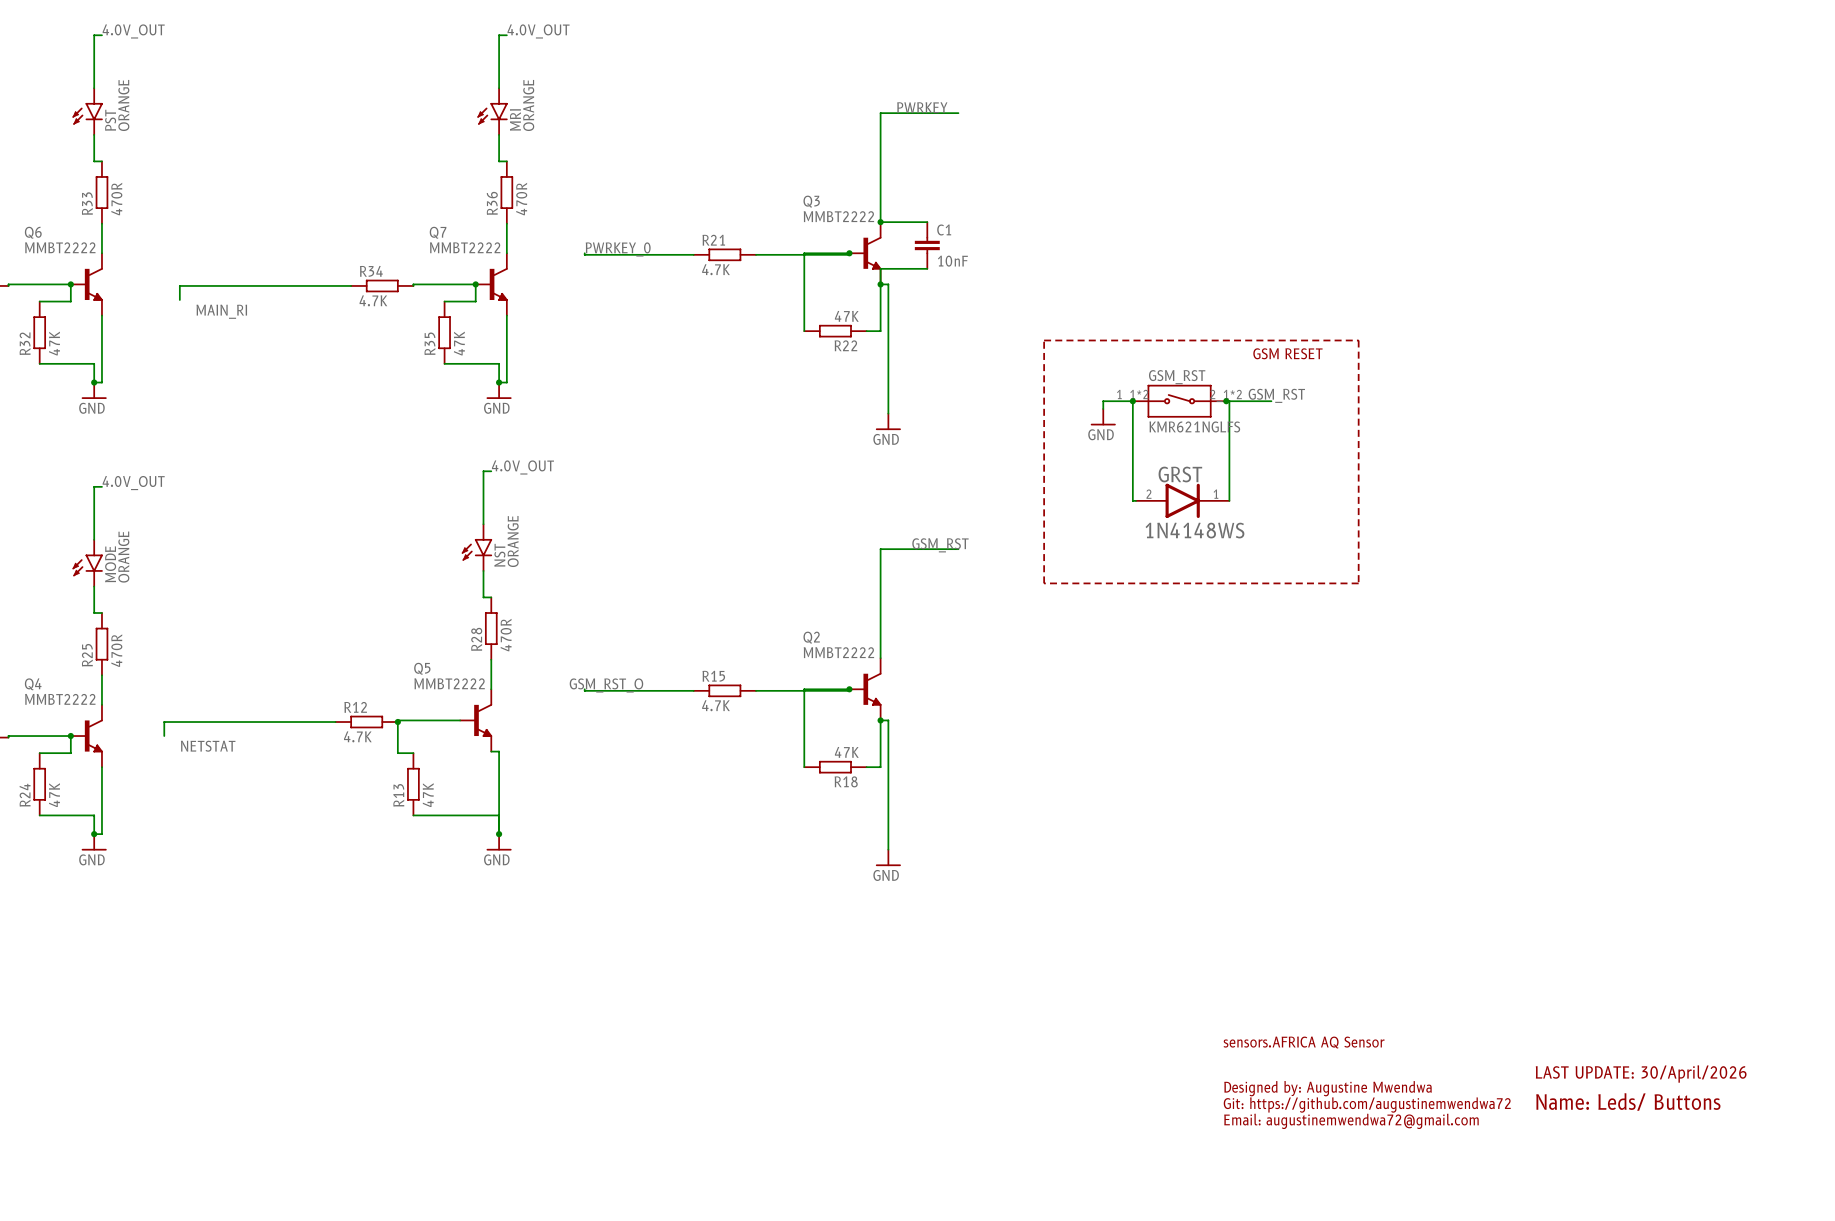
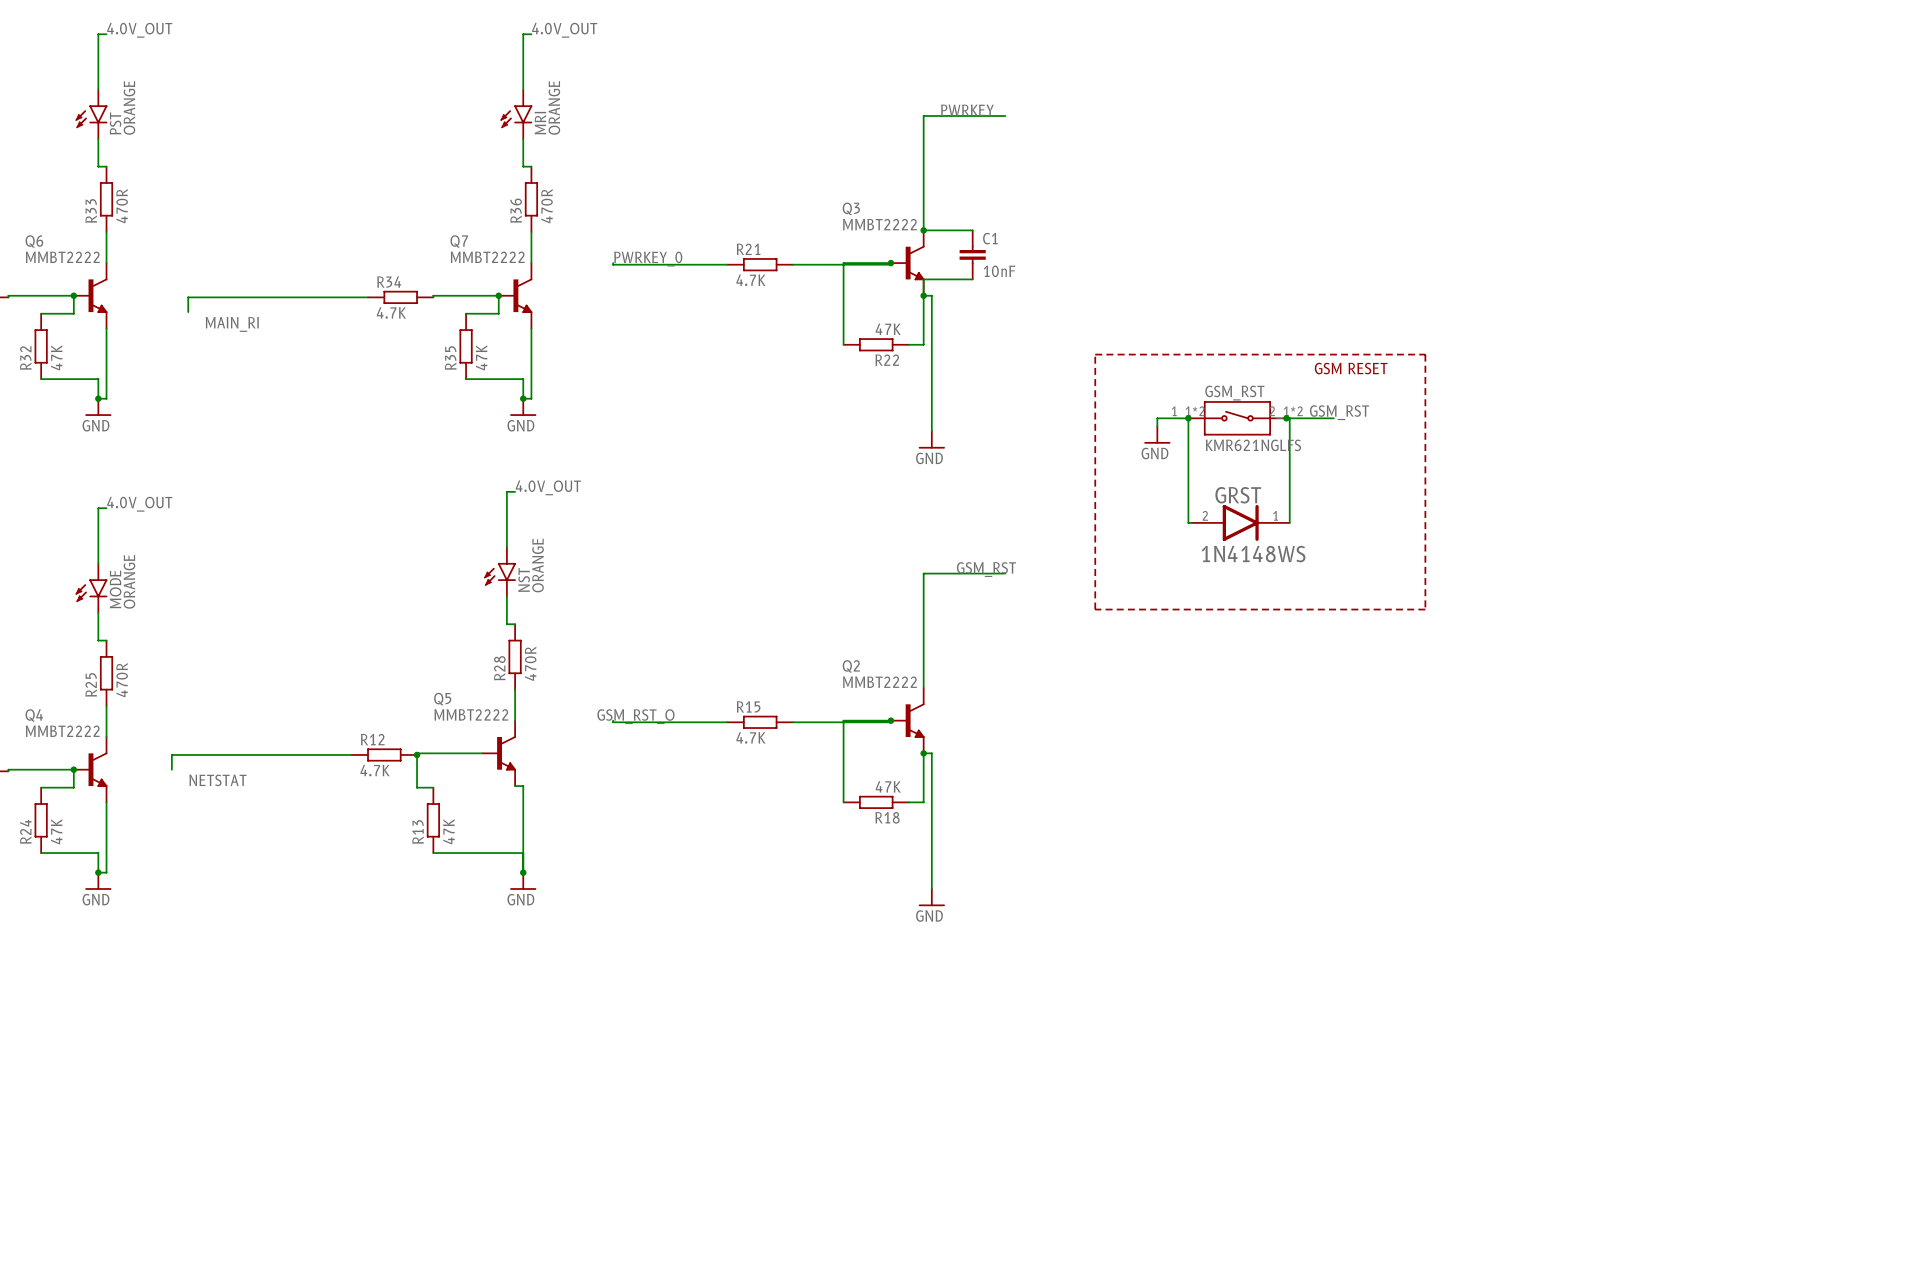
text: sensors.AFRICA AQ Sensor (1304, 1042) -> none
text: LAST UPDATE: 30/April/2026 (1641, 1074) -> none
text: Designed by: Augustine Mwendwa (1328, 1088) -> none
text: Name: Leds/ Buttons (1628, 1101) -> none
text: Git: https://github.com/augustinemwendwa72 (1367, 1105) -> none
text: Email: augustinemwendwa72@gmail.com (1351, 1121) -> none

